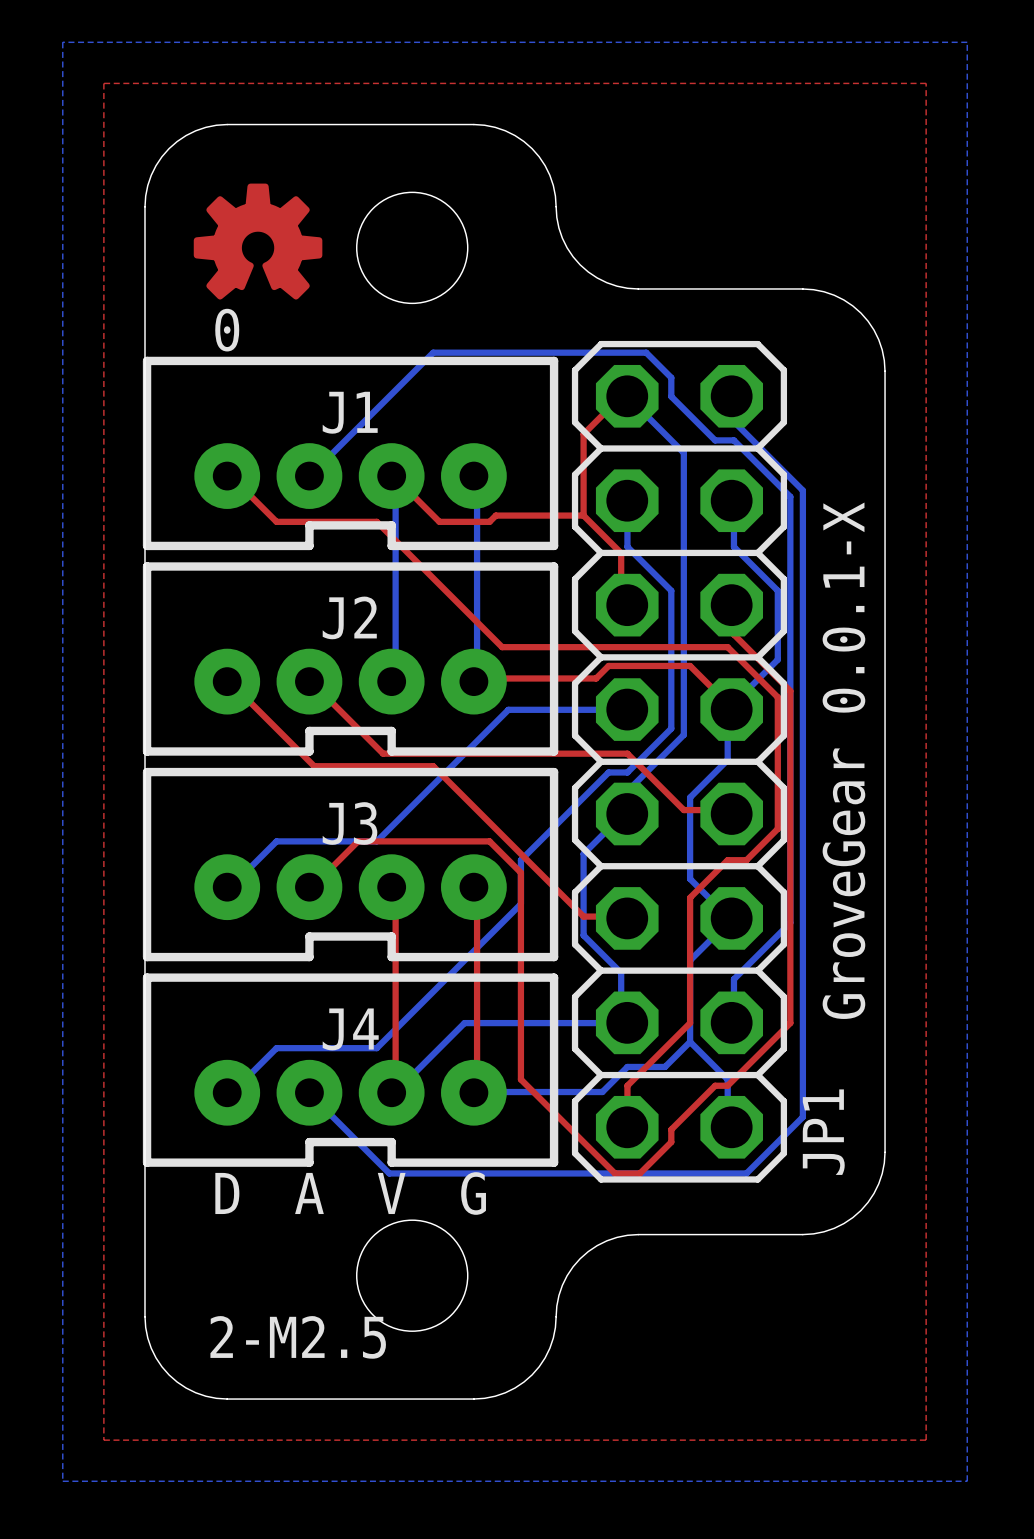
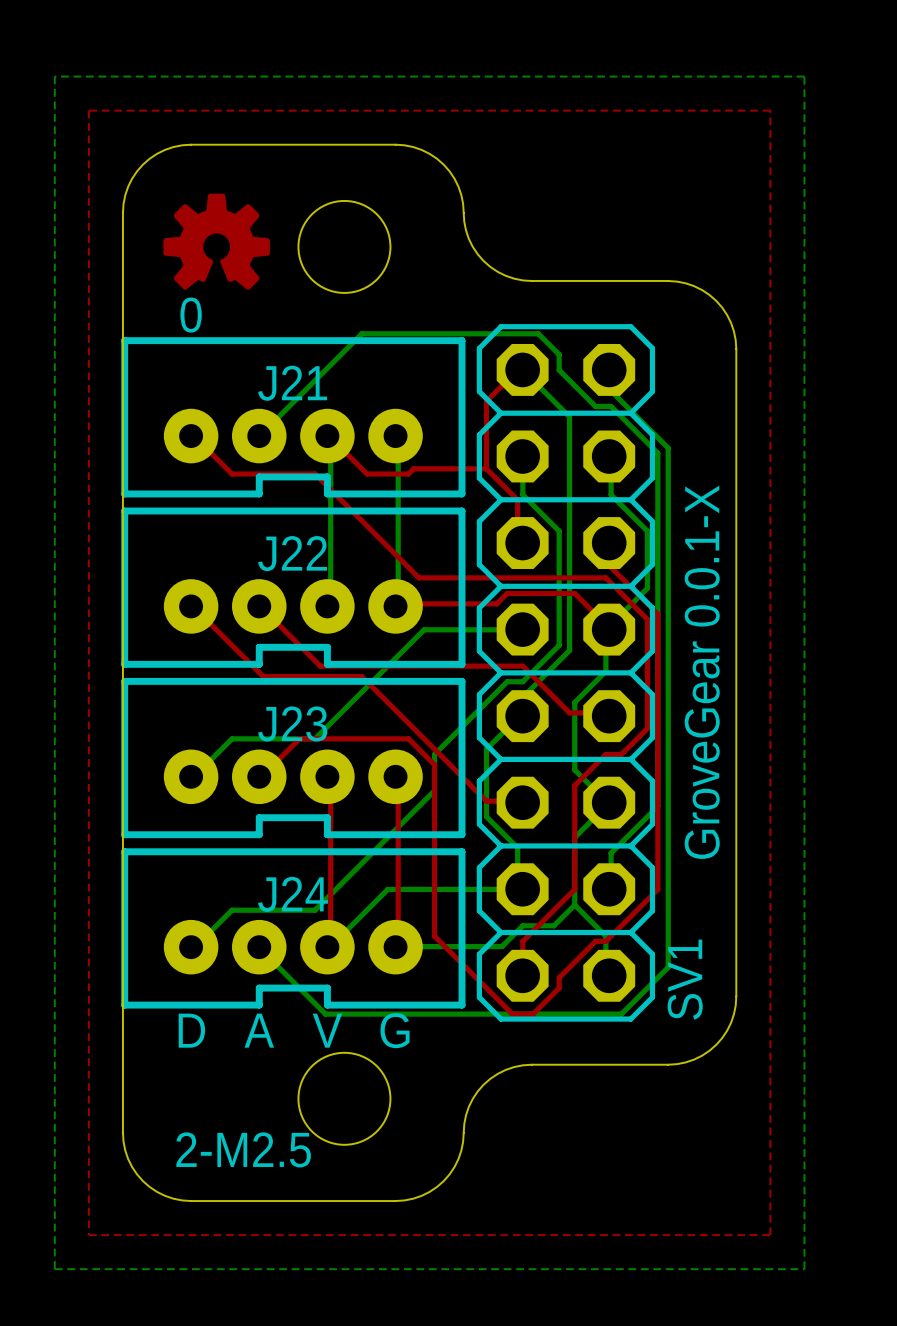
J1 name: J1 (350, 412) -> J21 (292, 383)
J2 name: J2 (349, 617) -> J22 (292, 553)
J3 name: J3 (350, 823) -> J23 (292, 723)
J4 name: J4 (350, 1029) -> J24 (293, 894)
JP1 name: JP1 (823, 1132) -> SV1 (685, 979)

